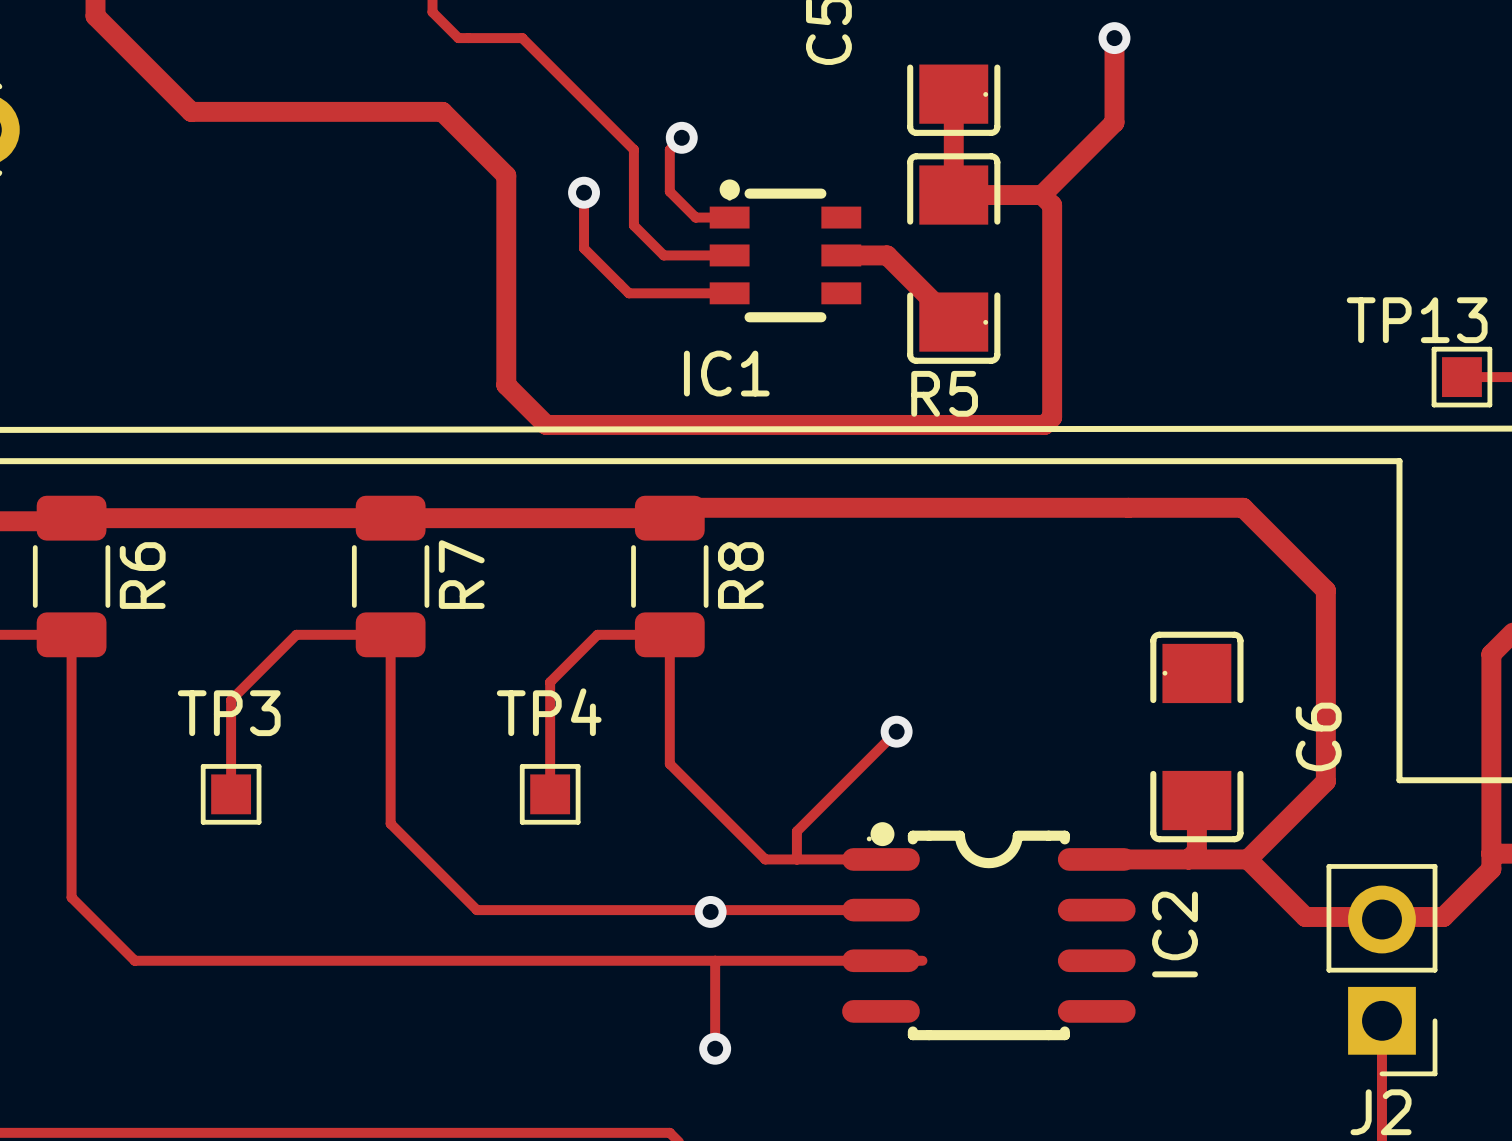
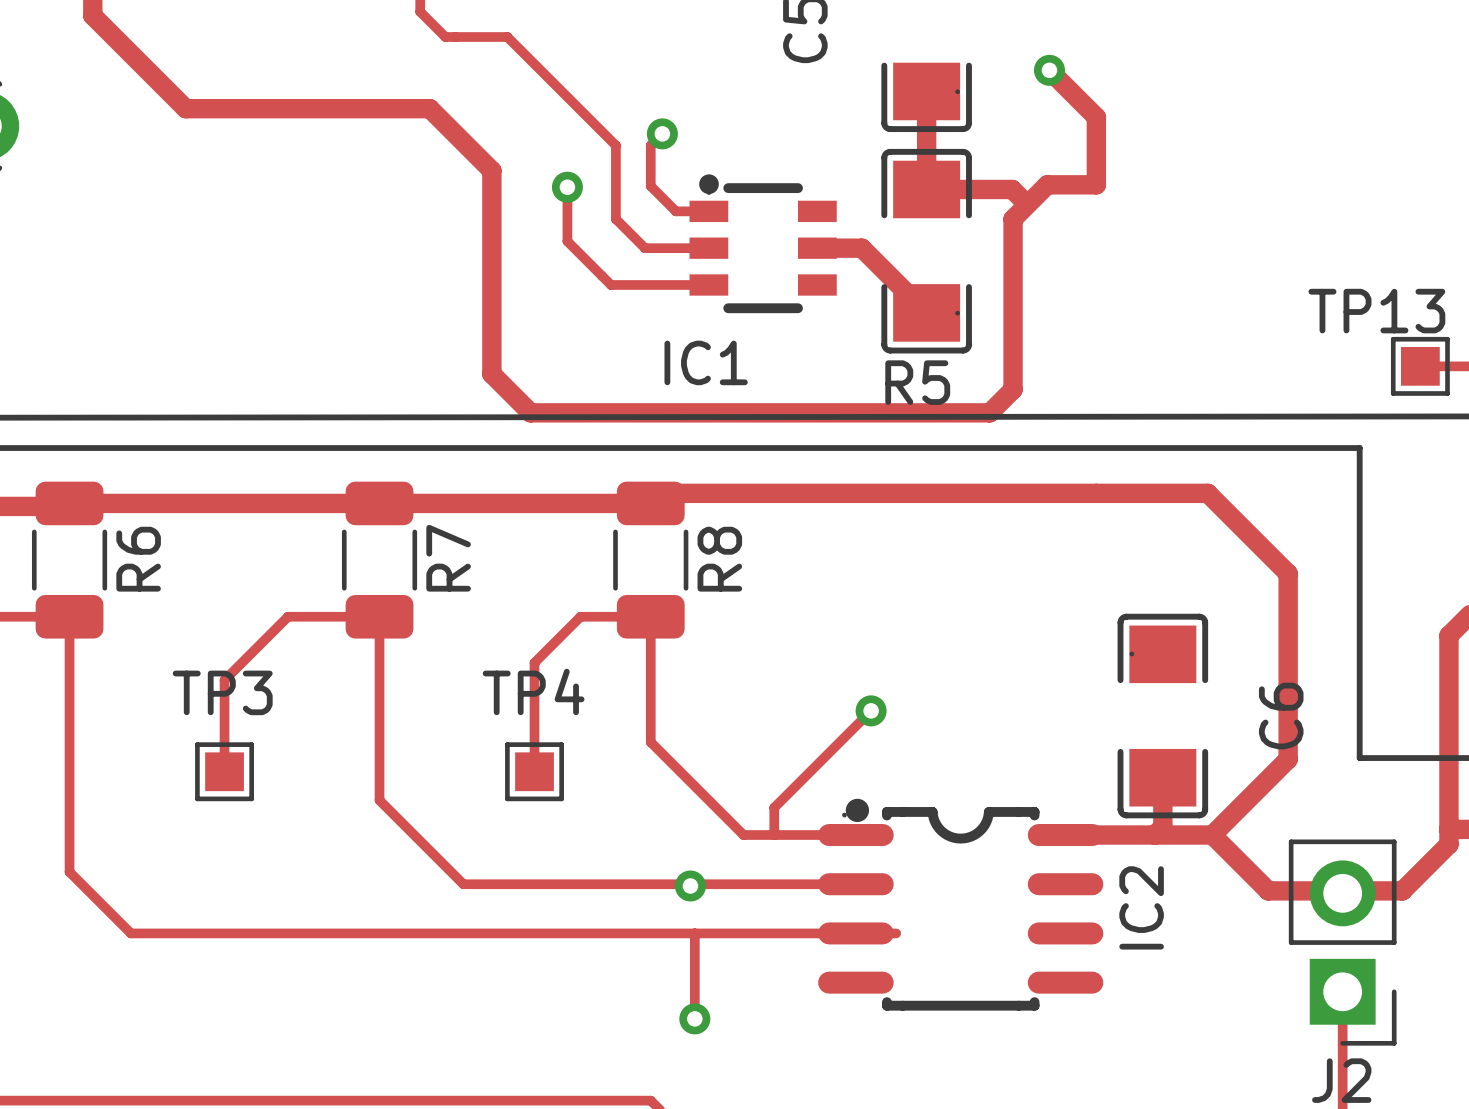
track: (1114, 38) (1114, 122) (1041, 195) -> none
via position: (1114, 38) -> (1049, 70)
track: (1052, 205) (1052, 417) (1044, 424) (1018, 424) -> (1049, 70) (1096, 117) (1096, 184) (1047, 184) (1013, 219) (1013, 389) (989, 412)

